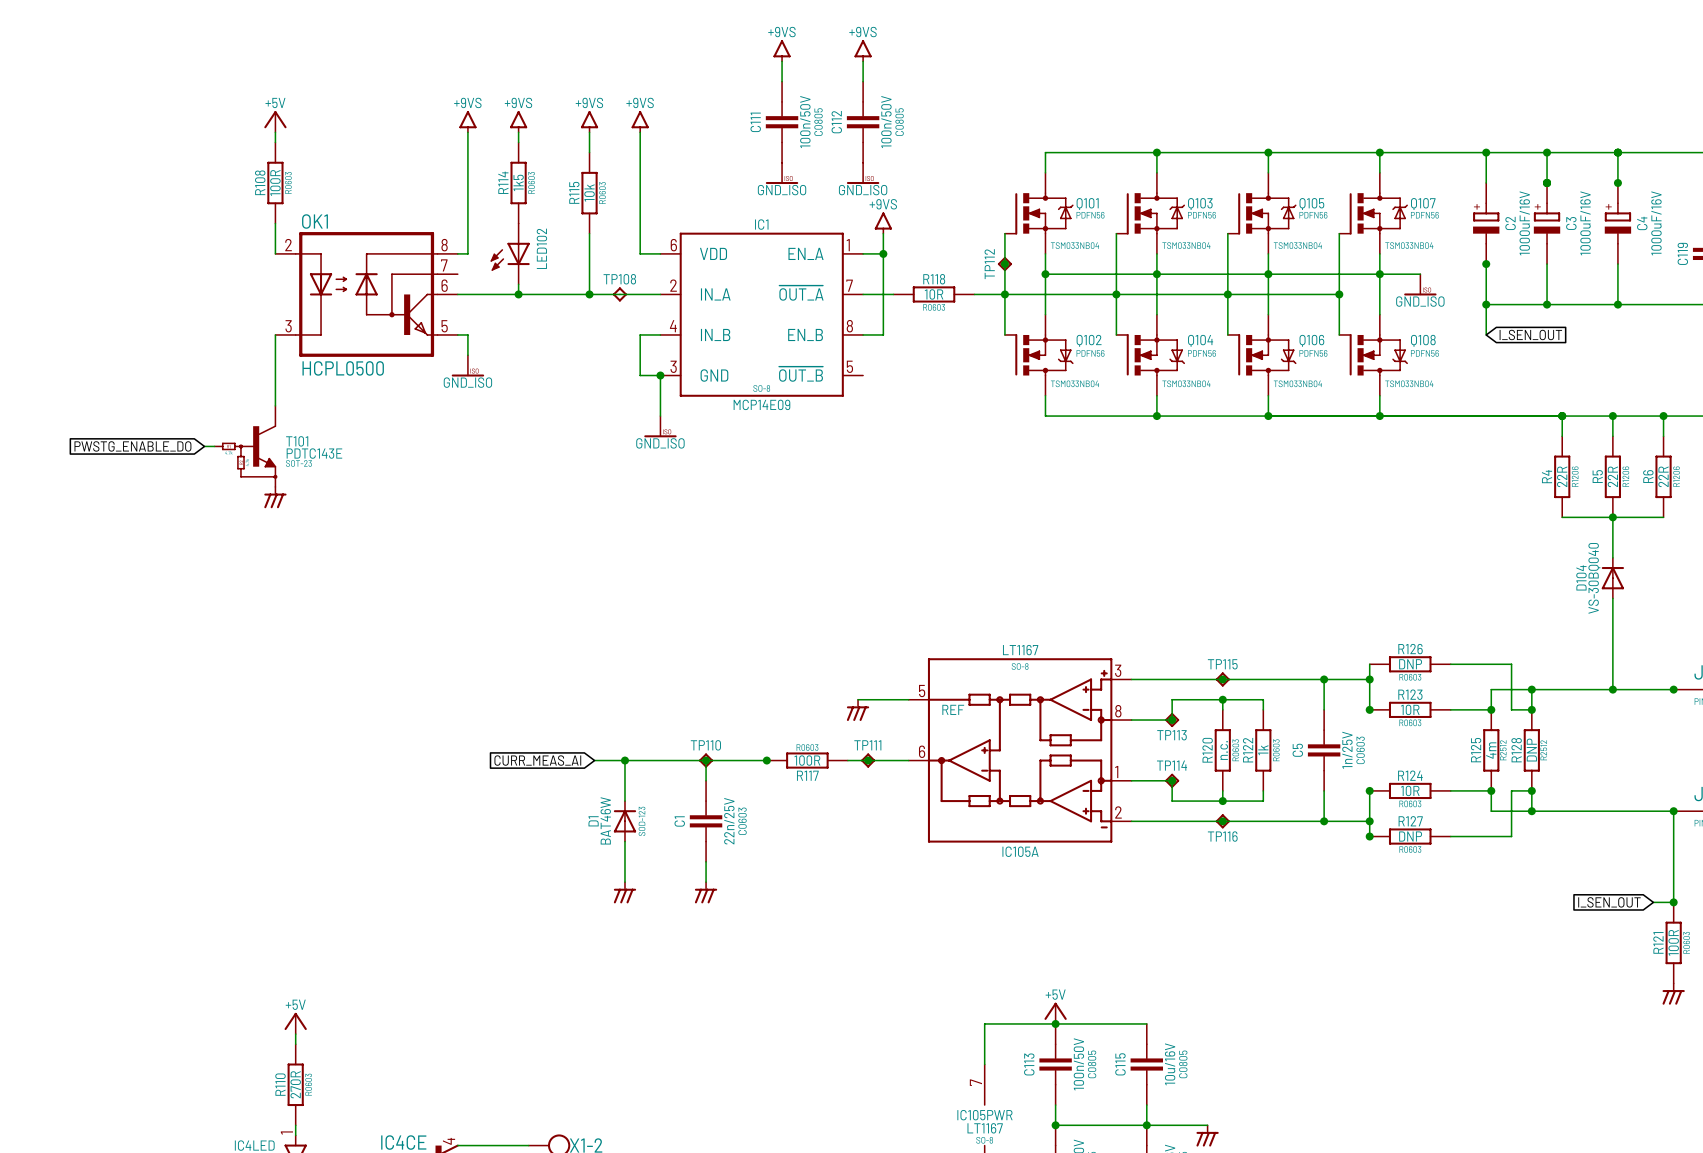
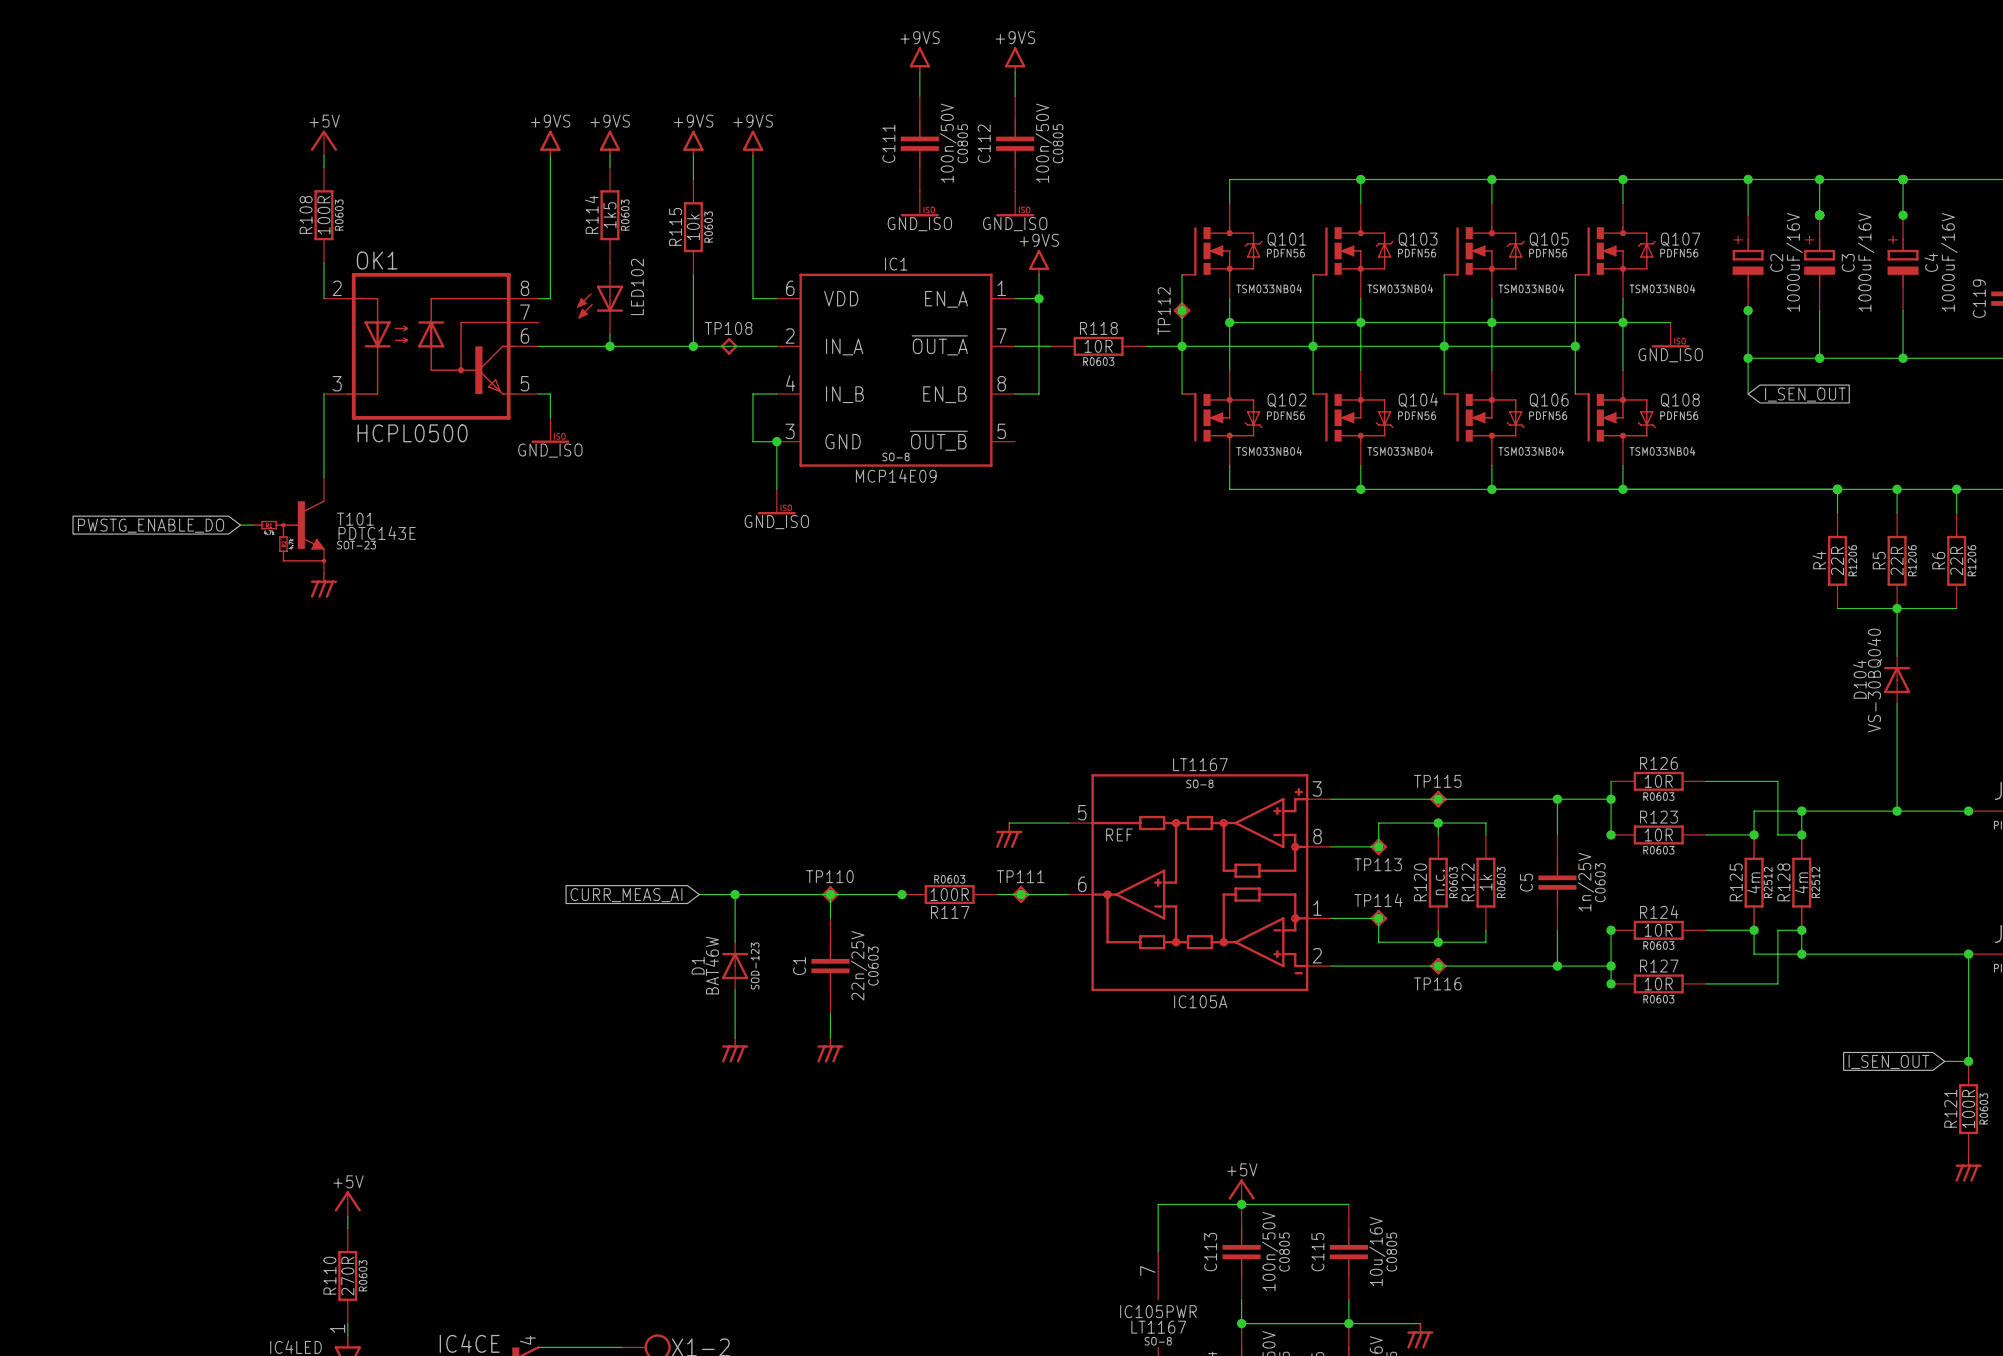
R126 value: DNP (1410, 664) -> 10R (1658, 781)
R128 value: DNP (1531, 750) -> 4m (1801, 882)
R127 value: DNP (1410, 836) -> 10R (1658, 983)

